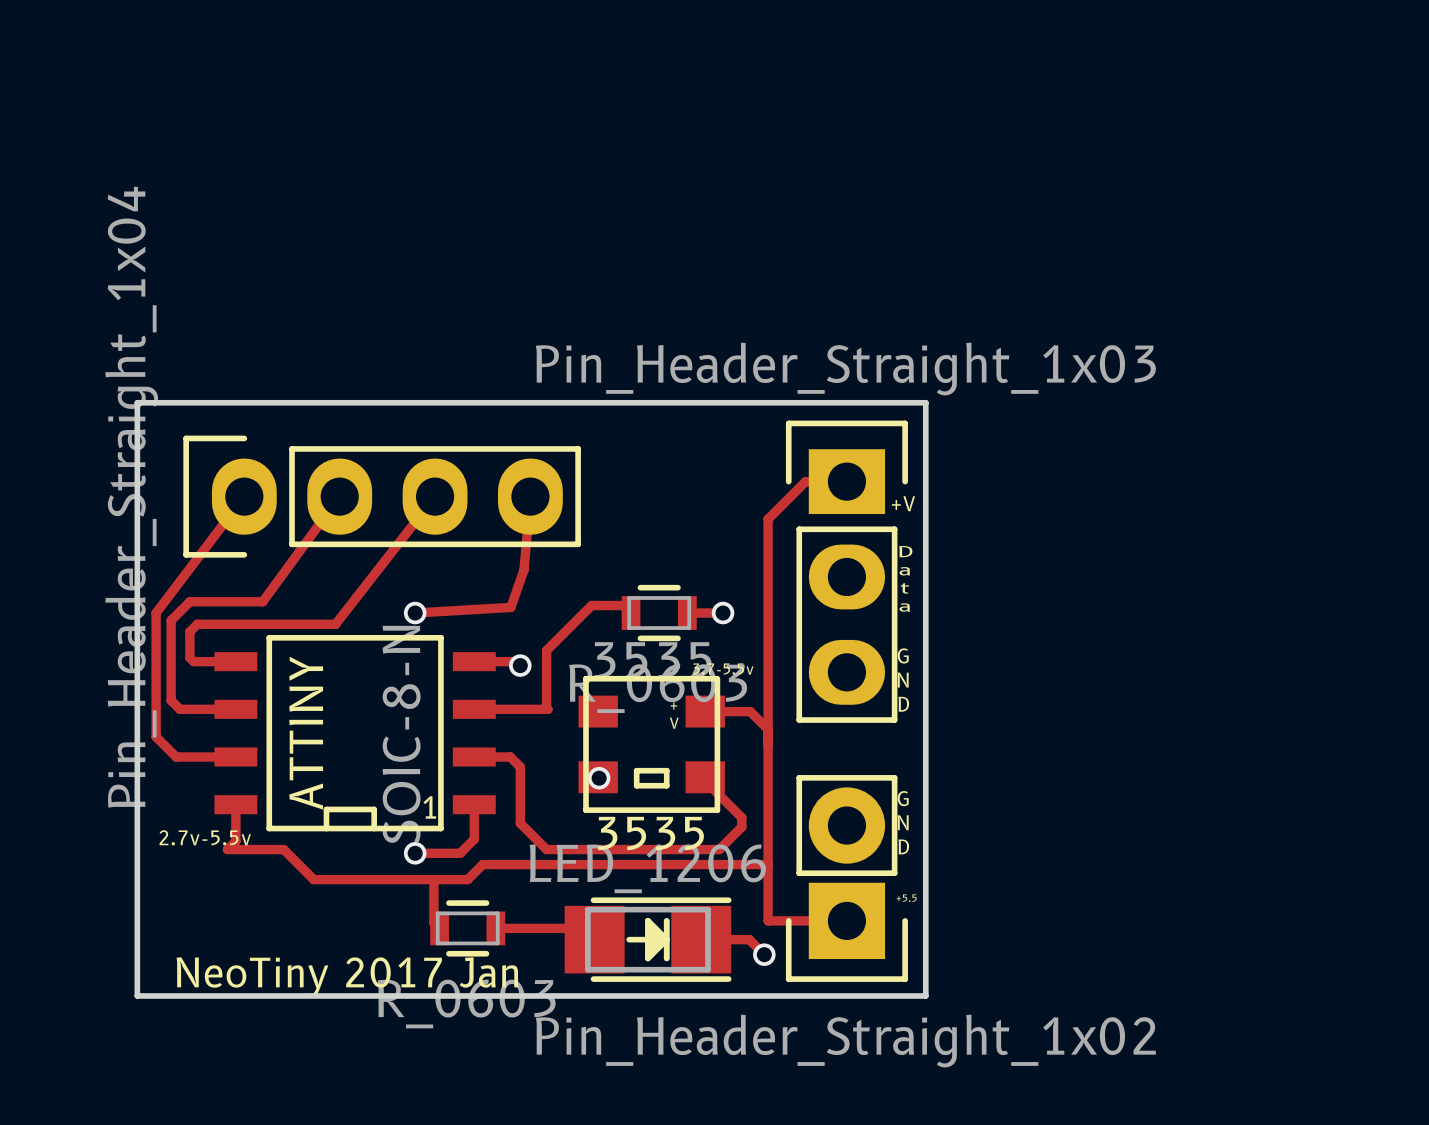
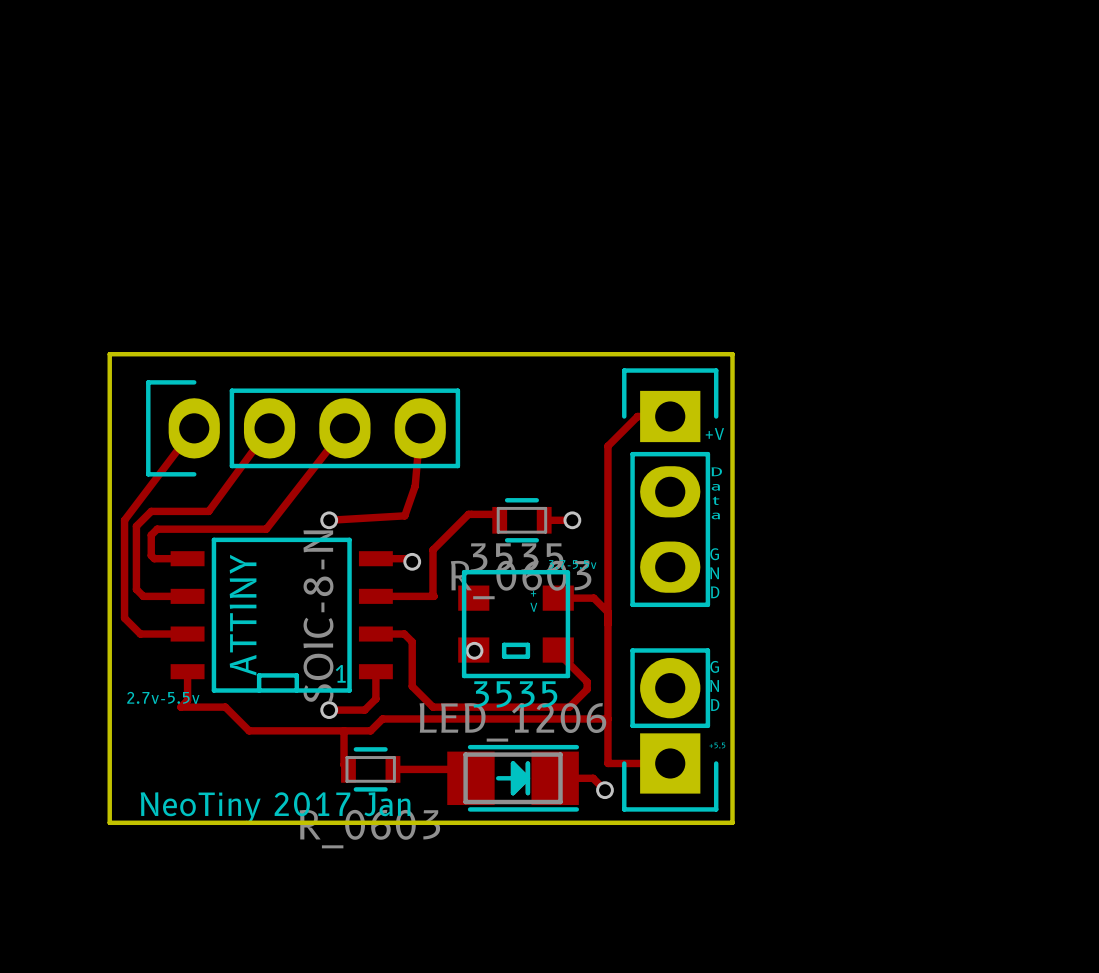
part value: Pin_Header_Straight_1x03 (845, 368) -> none
part value: Pin_Header_Straight_1x04 (131, 497) -> none
part value: Pin_Header_Straight_1x02 (845, 1041) -> none

